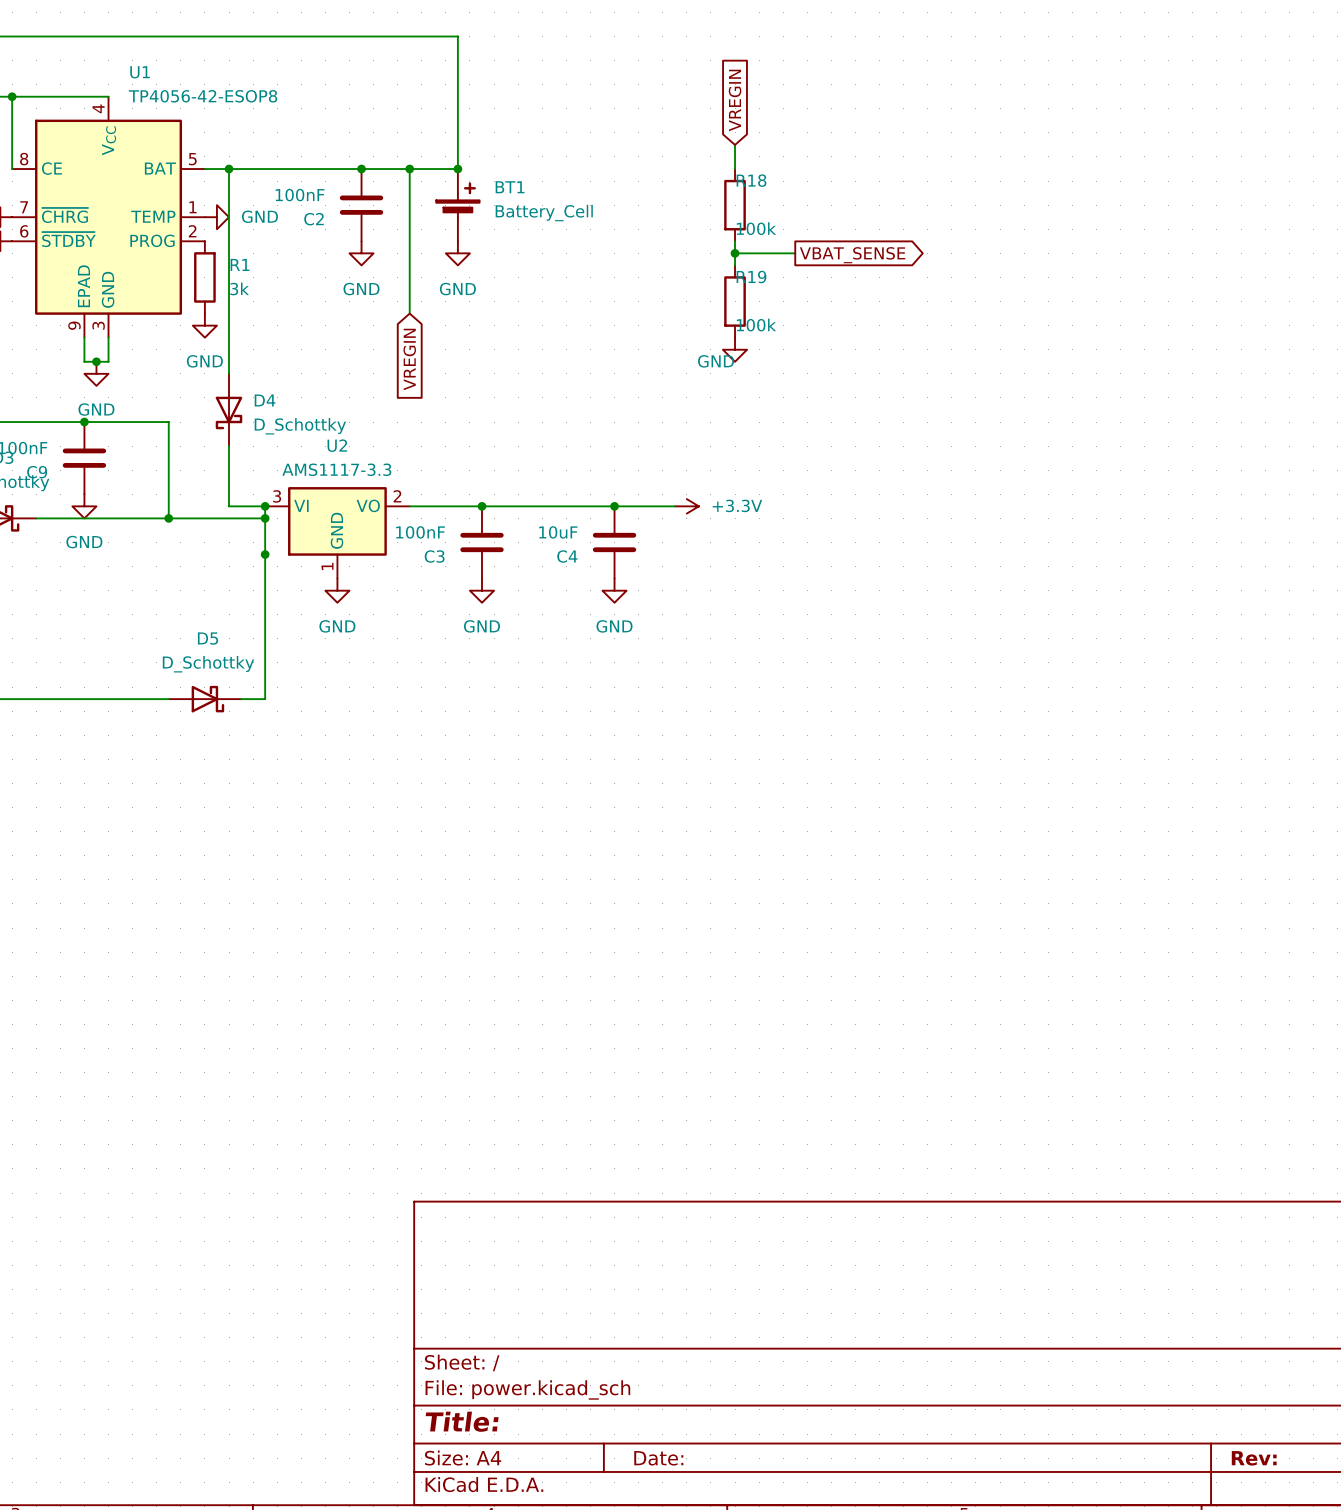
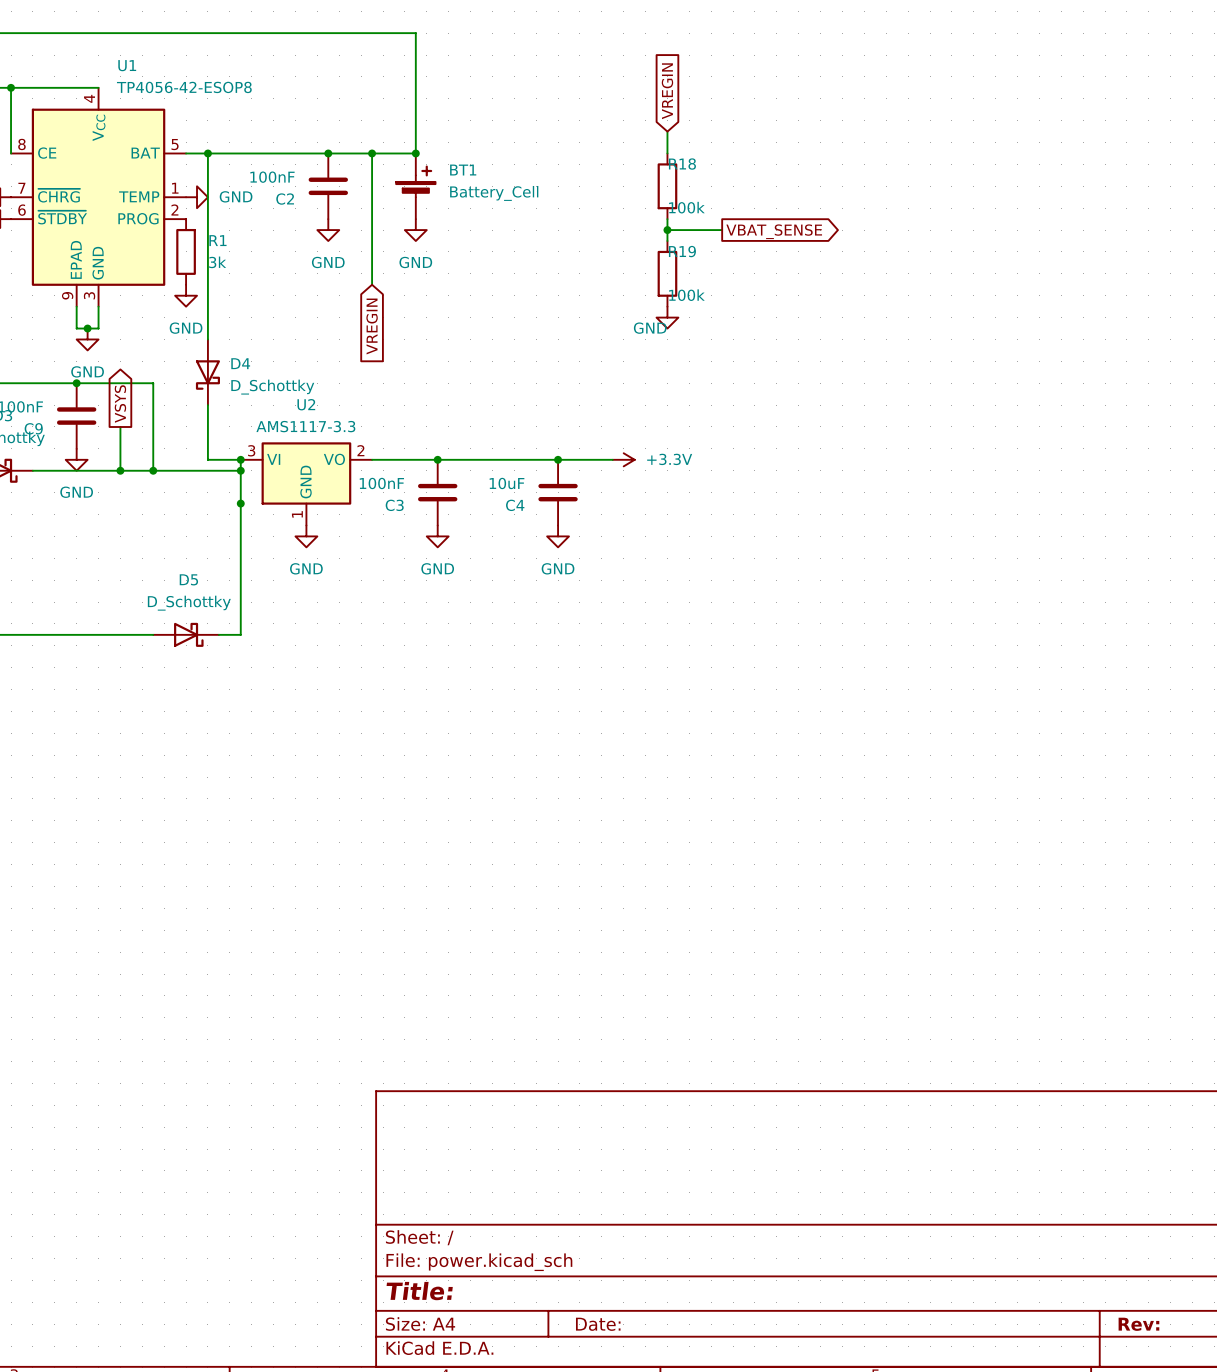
global label: none -> VSYS (120, 404)
wire: none -> (120, 426) (120, 470)
junction: none -> (120, 470)

